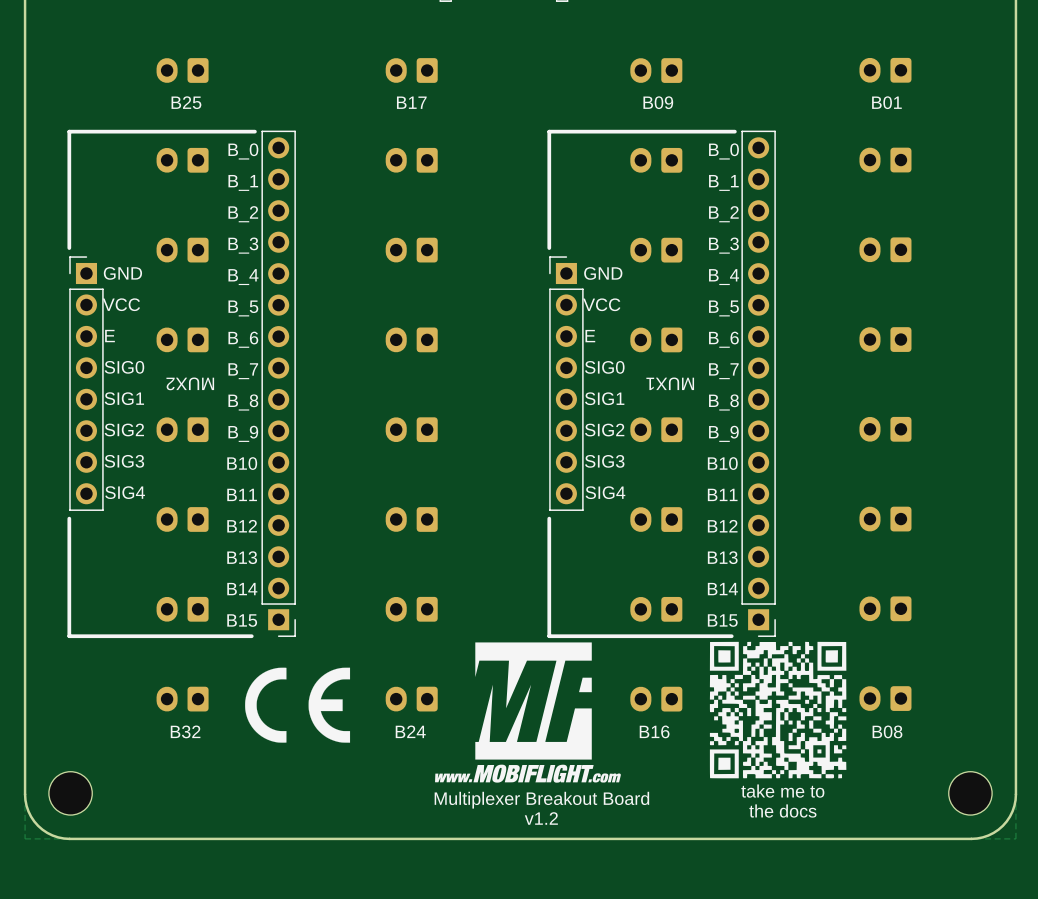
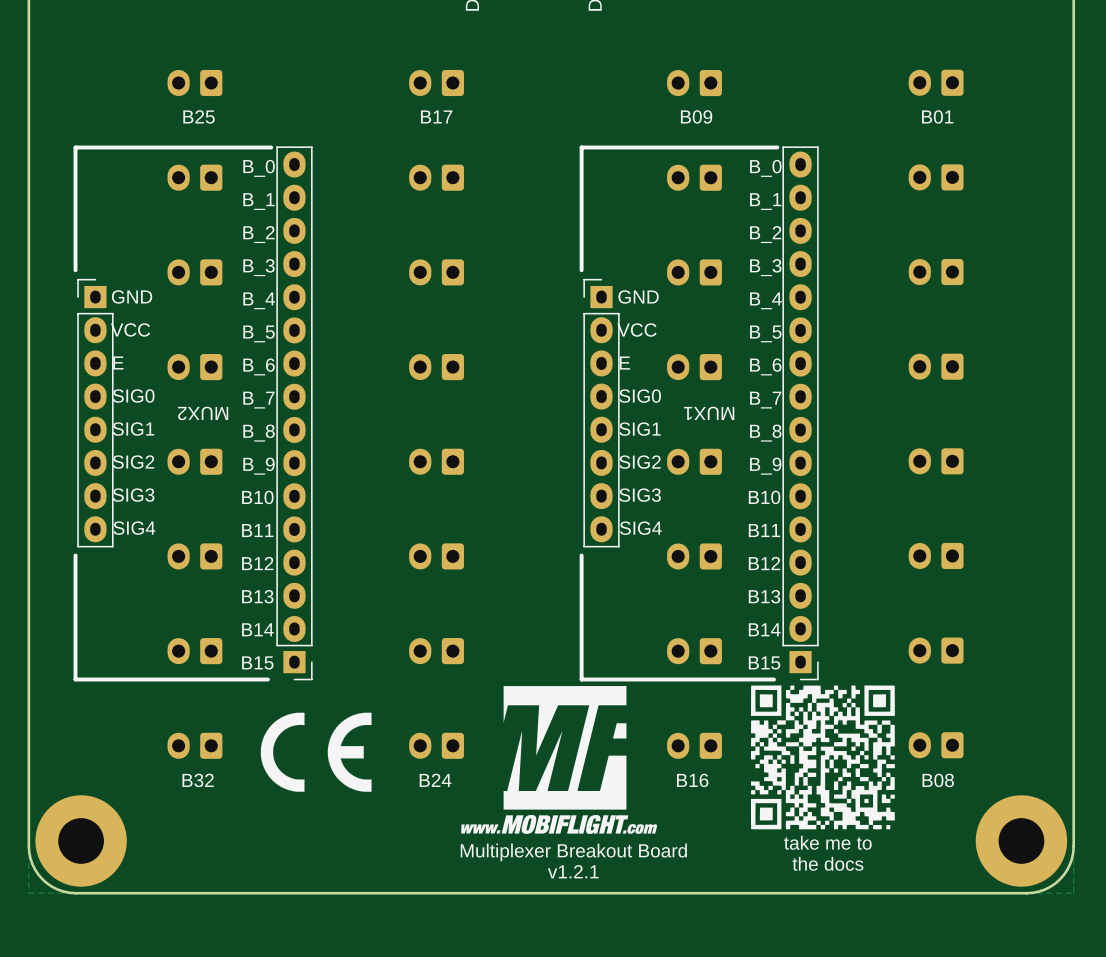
MUX2 footprint: [67, 129, 296, 639] -> [73, 145, 313, 682]
MUX1 footprint: [547, 129, 776, 639] -> [579, 145, 819, 682]
part footprint: [48, 771, 93, 816] -> [35, 795, 127, 887]
part footprint: [948, 771, 993, 816] -> [975, 795, 1068, 887]
text: v1.2 (541, 818) -> v1.2.1 (573, 871)

